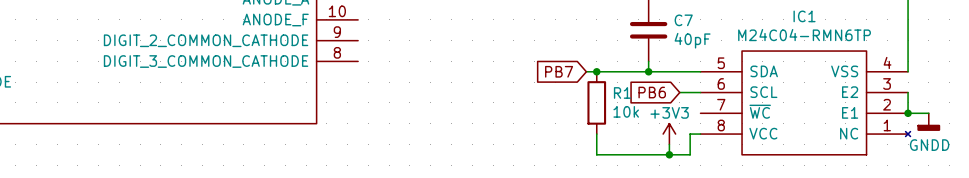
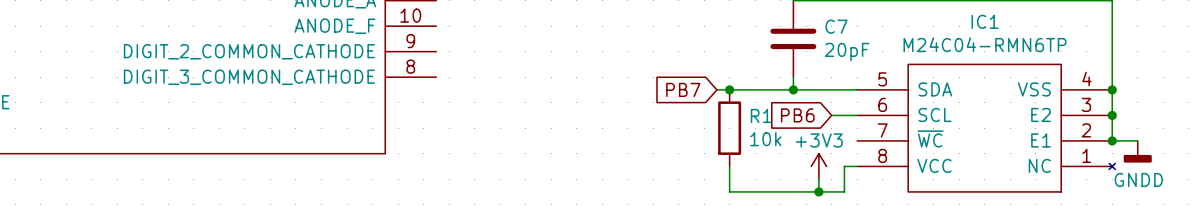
C7 value: 40pF (692, 40) -> 20pF (847, 52)
wire: none -> (1112, 89) (1112, 115)
junction: none -> (1112, 89)
junction: none -> (1112, 115)

